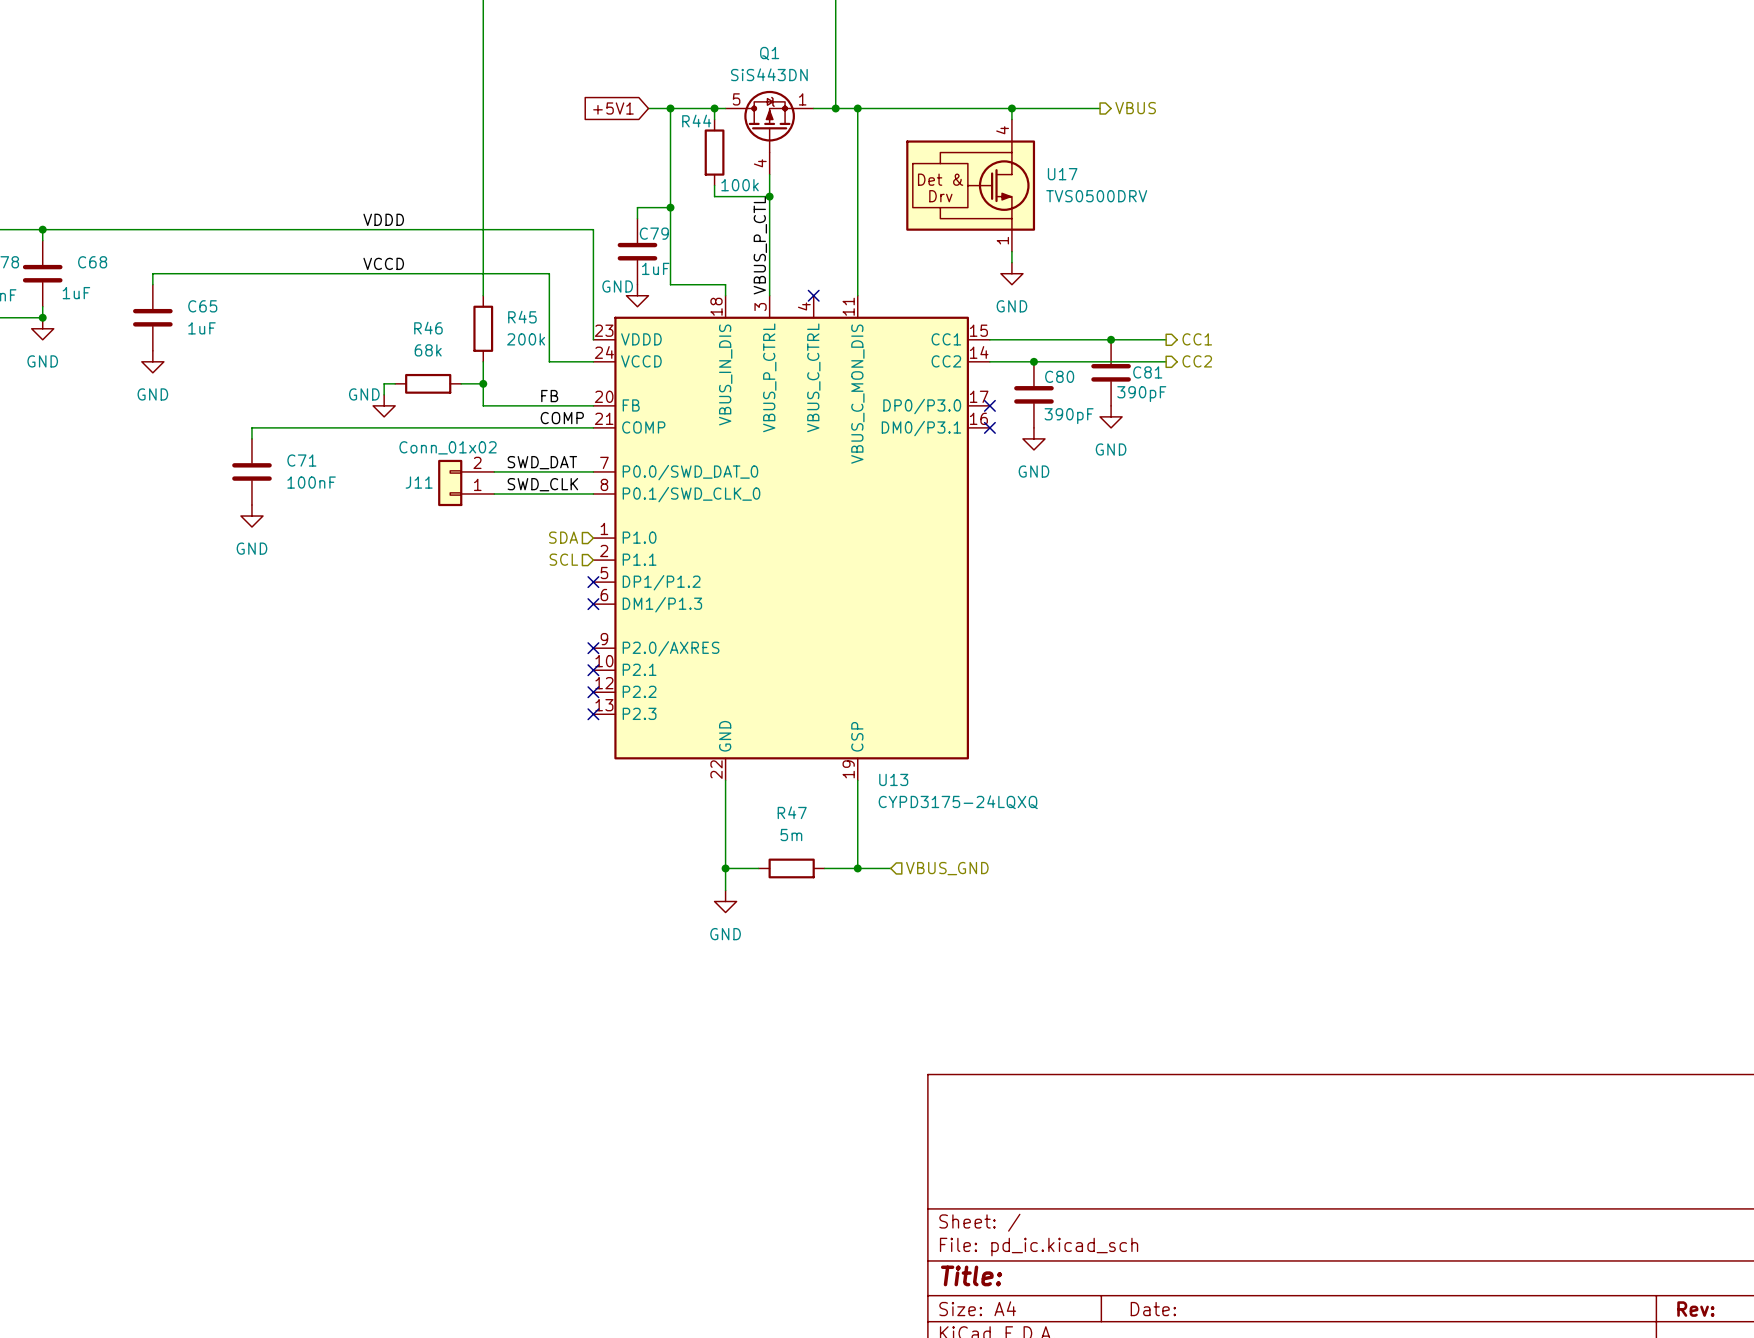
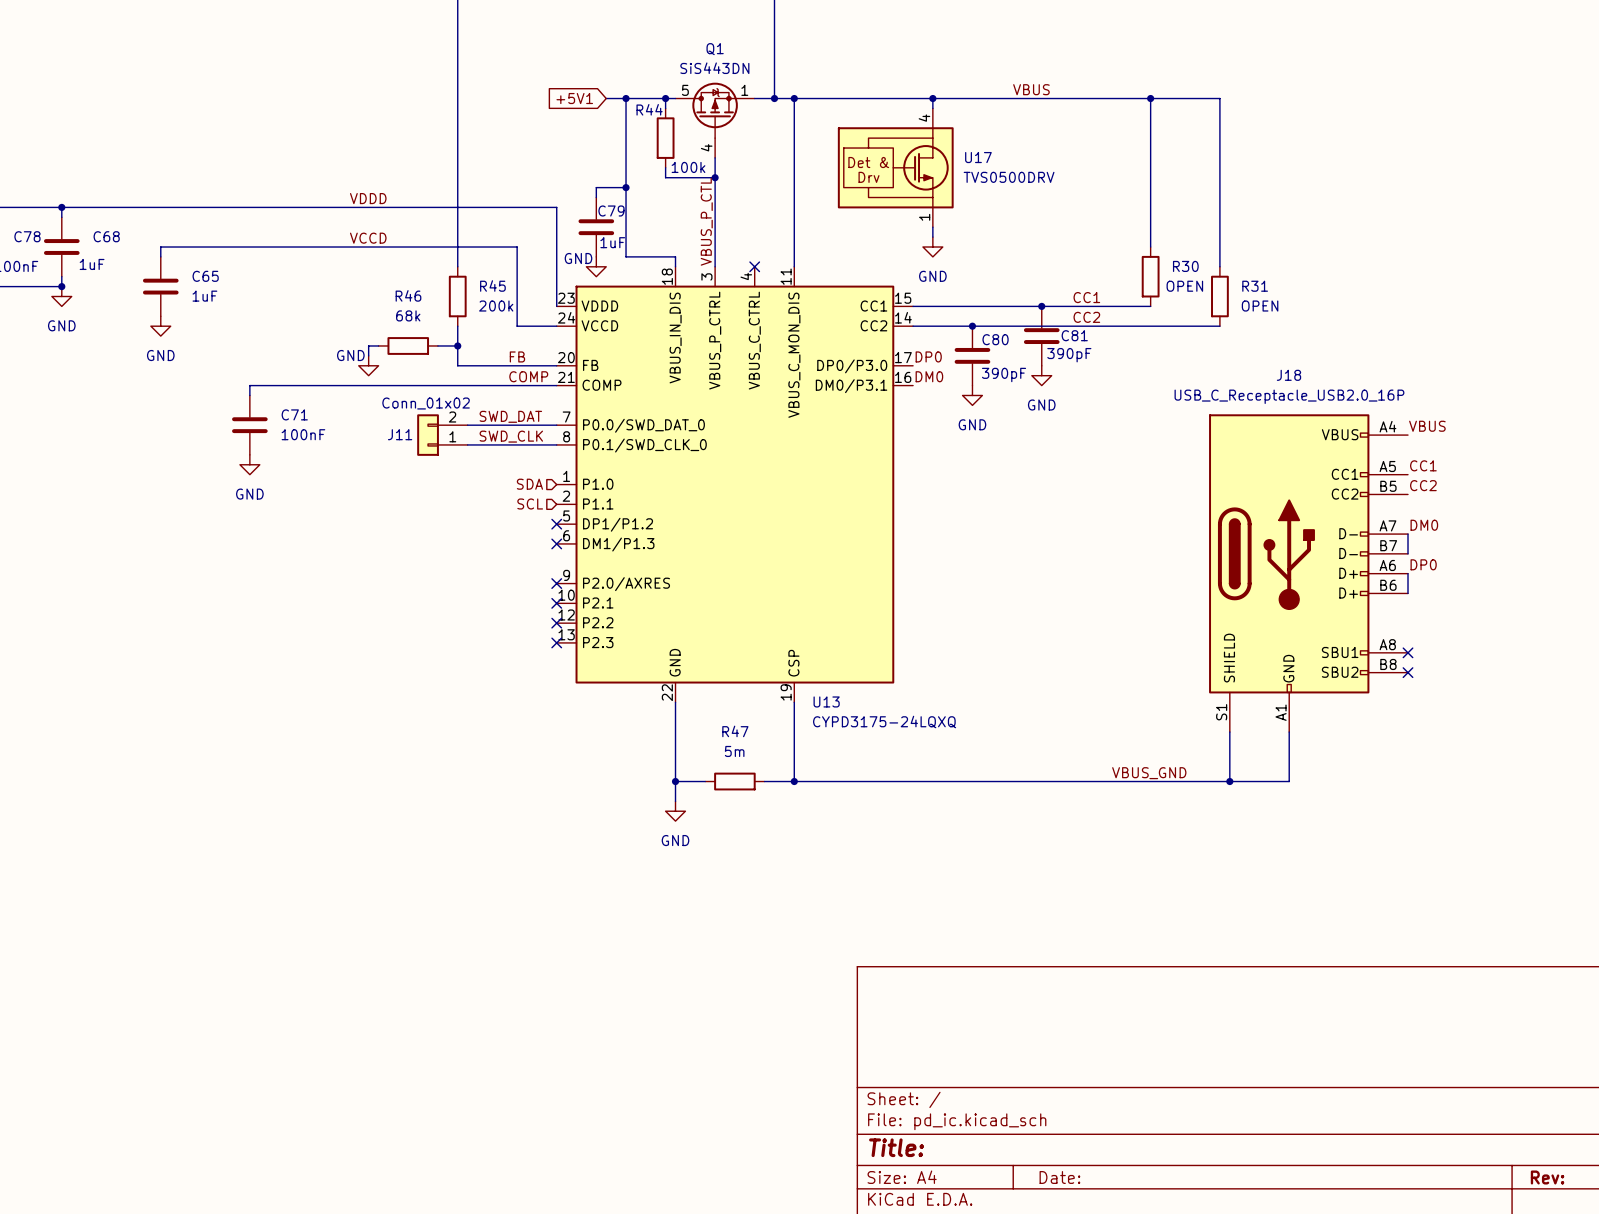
label: none -> VBUS (1031, 89)
wire: none -> (1012, 98) (1219, 98) (1219, 266)
hierarchical label: VBUS (1135, 108) -> none
wire: none -> (1150, 98) (1150, 247)
junction: none -> (1150, 98)
R30: none -> OPEN (1150, 276)
R31: none -> OPEN (1219, 296)
label: none -> CC1 (1086, 297)
junction position: (1111, 339) -> (1041, 306)
wire: none -> (1071, 306) (1150, 306)
hierarchical label: CC1 (1197, 339) -> none
label: none -> CC2 (1086, 317)
junction position: (1033, 361) -> (972, 326)
wire: none -> (1071, 326) (1219, 326)
hierarchical label: CC2 (1197, 361) -> none
C81 position: (1111, 372) -> (1041, 336)
C80 position: (1033, 394) -> (972, 355)
label: none -> DP0 (928, 356)
no-connect mark: (989, 405) -> none
power symbol position: GND (1111, 416) -> GND (1041, 375)
label: none -> DM0 (929, 376)
no-connect mark: (989, 427) -> none
power symbol position: GND (1033, 438) -> GND (972, 395)
label: none -> VBUS (1427, 426)
label: none -> CC1 (1423, 465)
label: none -> CC2 (1423, 485)
label: none -> DM0 (1424, 525)
wire: none -> (1408, 534) (1408, 553)
label: none -> DP0 (1423, 564)
J18: none -> USB_C_Receptacle_USB2.0_16P (1308, 573)
wire: none -> (1408, 573) (1408, 593)
no-connect mark: none -> (1408, 652)
no-connect mark: none -> (1408, 672)
wire: none -> (1229, 732) (1229, 781)
wire: none -> (1289, 732) (1289, 781) (823, 781)
label: none -> VBUS_GND (1149, 773)
hierarchical label: VBUS_GND (947, 868) -> none
junction: none -> (1229, 781)

